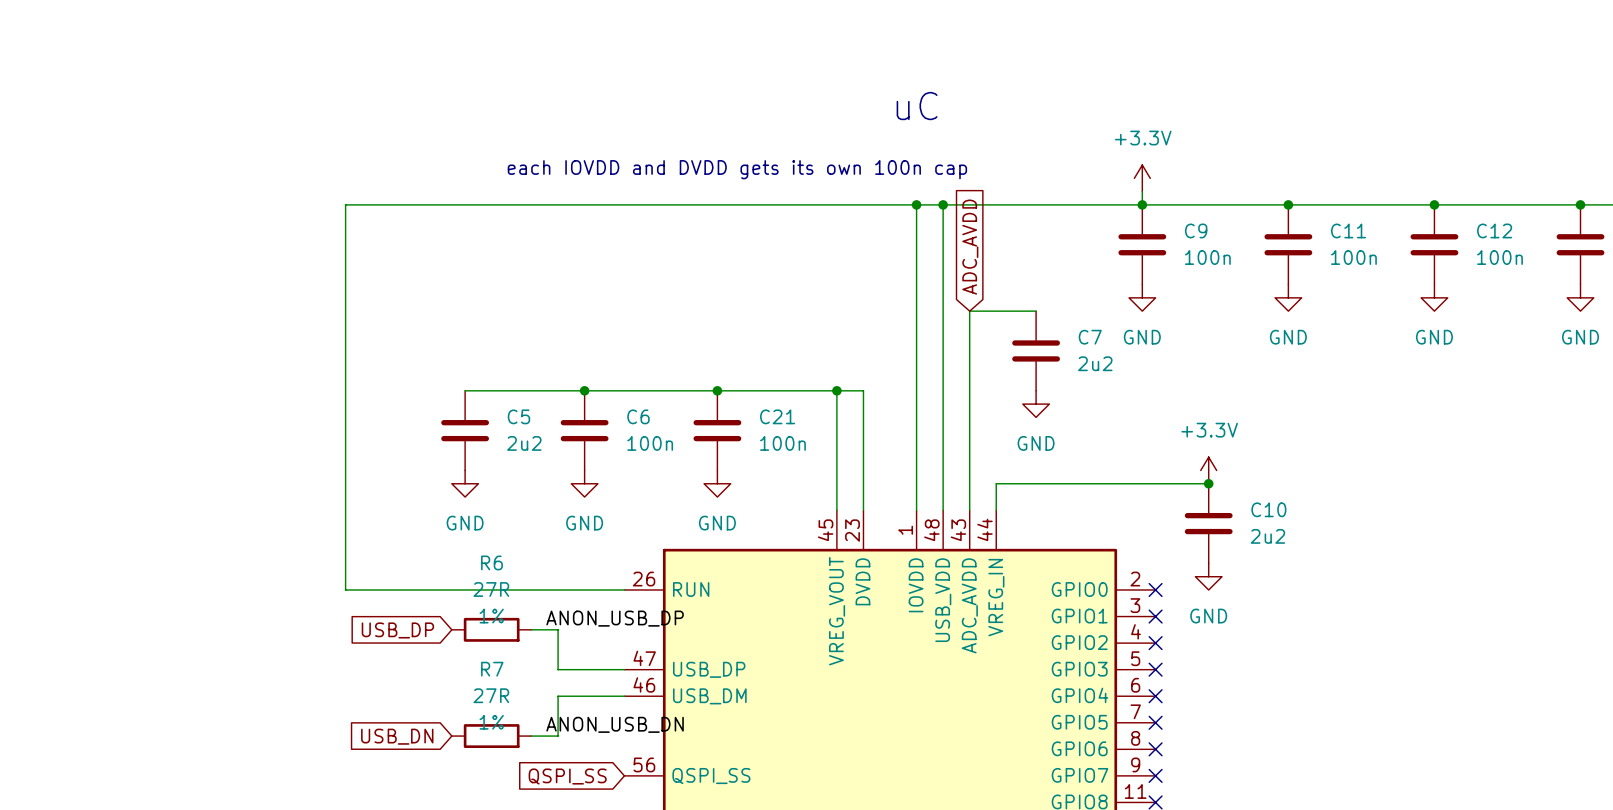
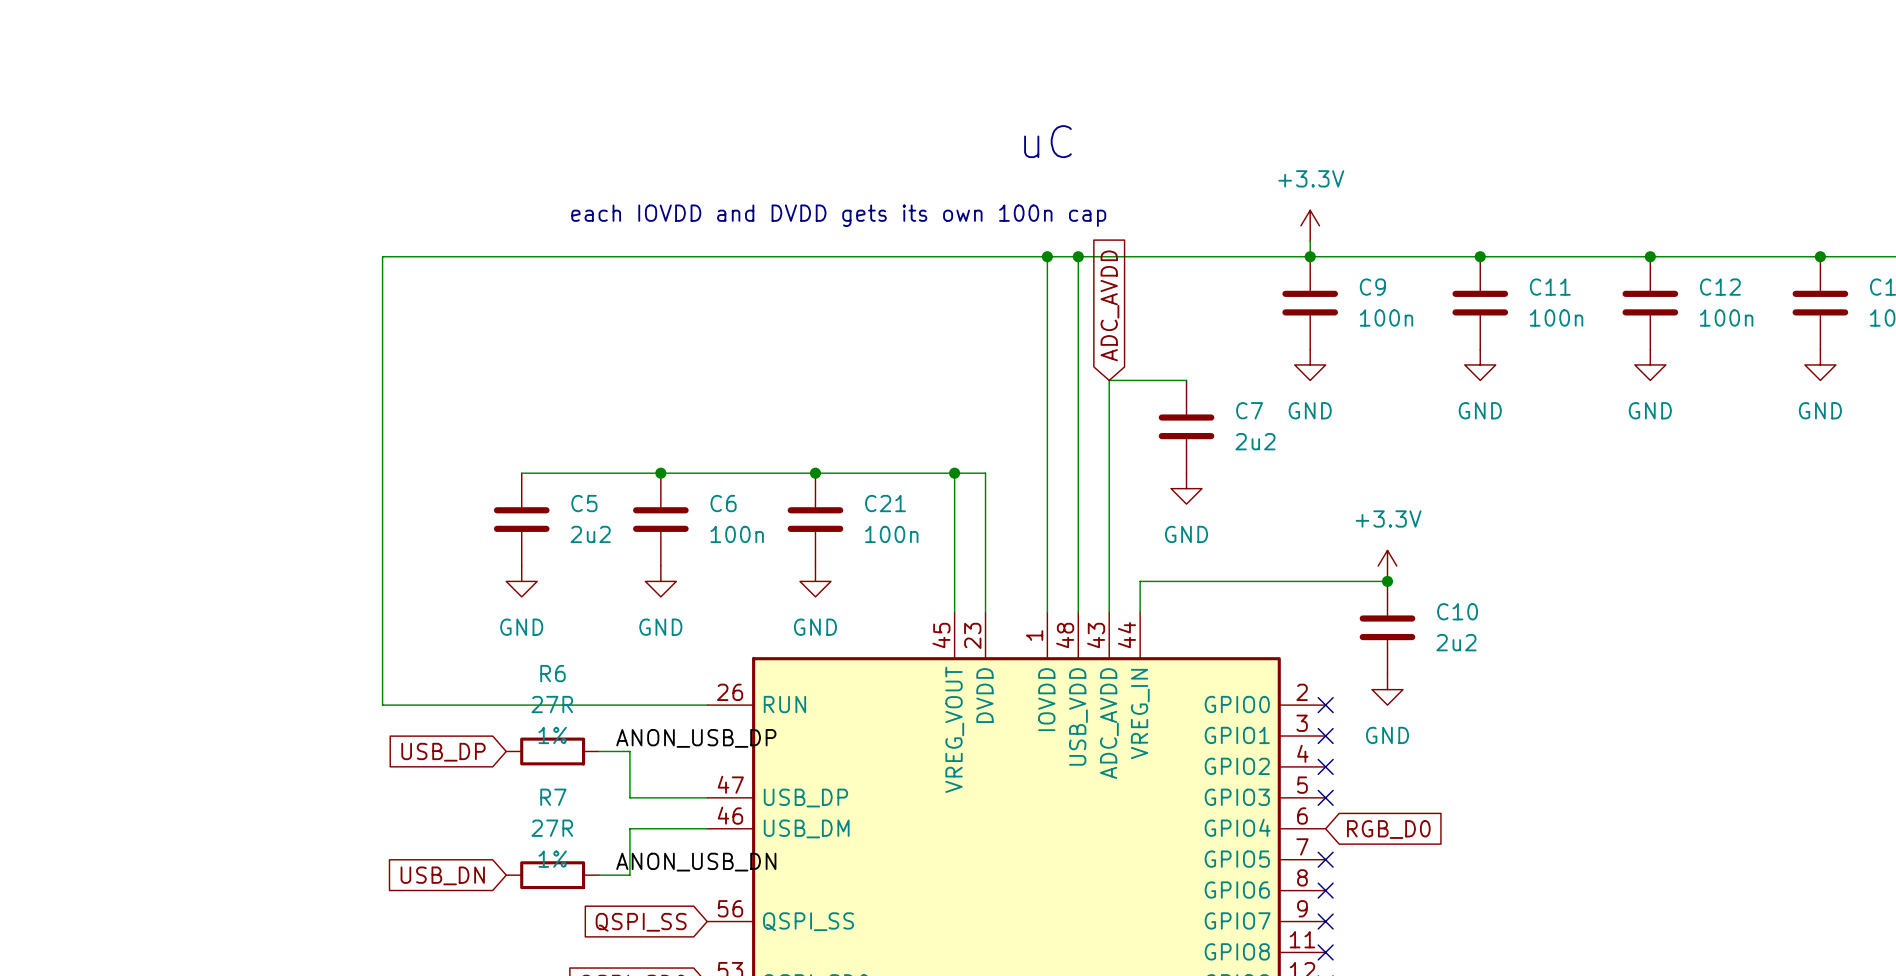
no-connect mark: (1155, 696) -> none
global label: none -> RGB_D0 (1388, 829)

